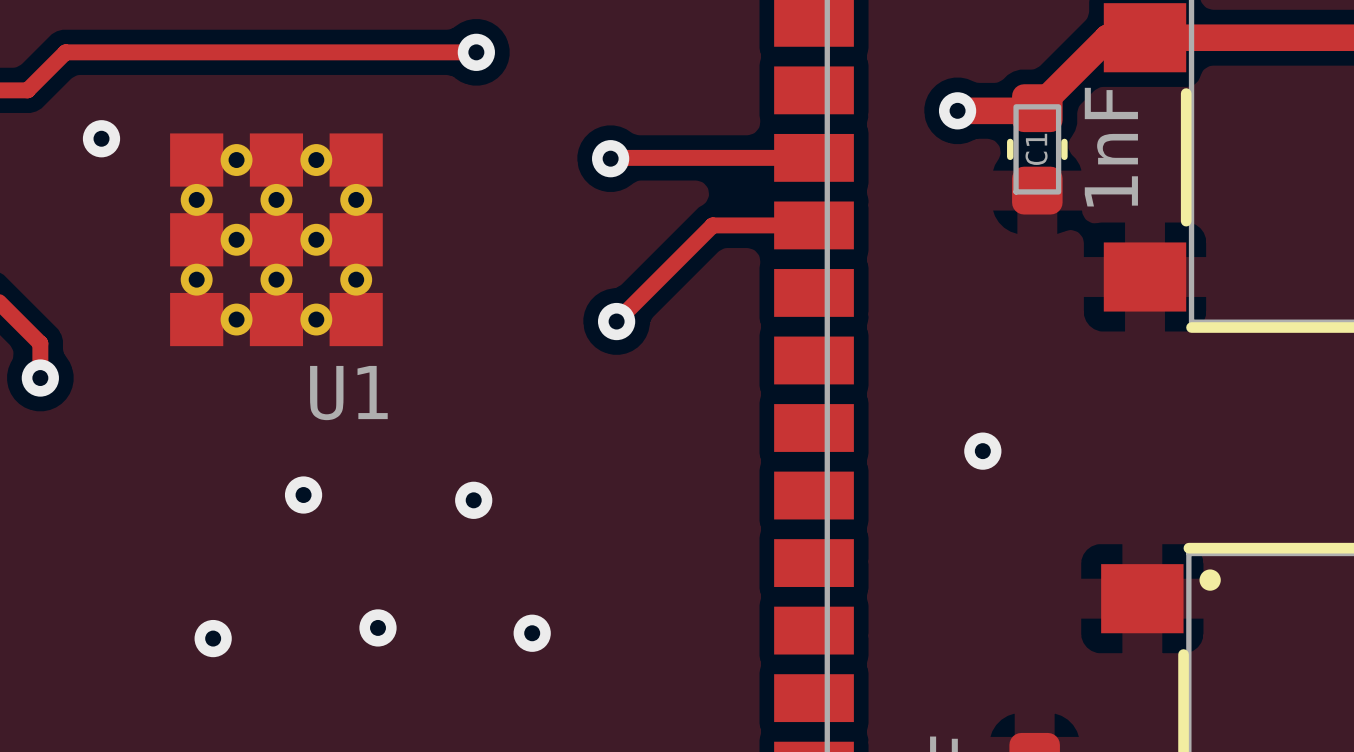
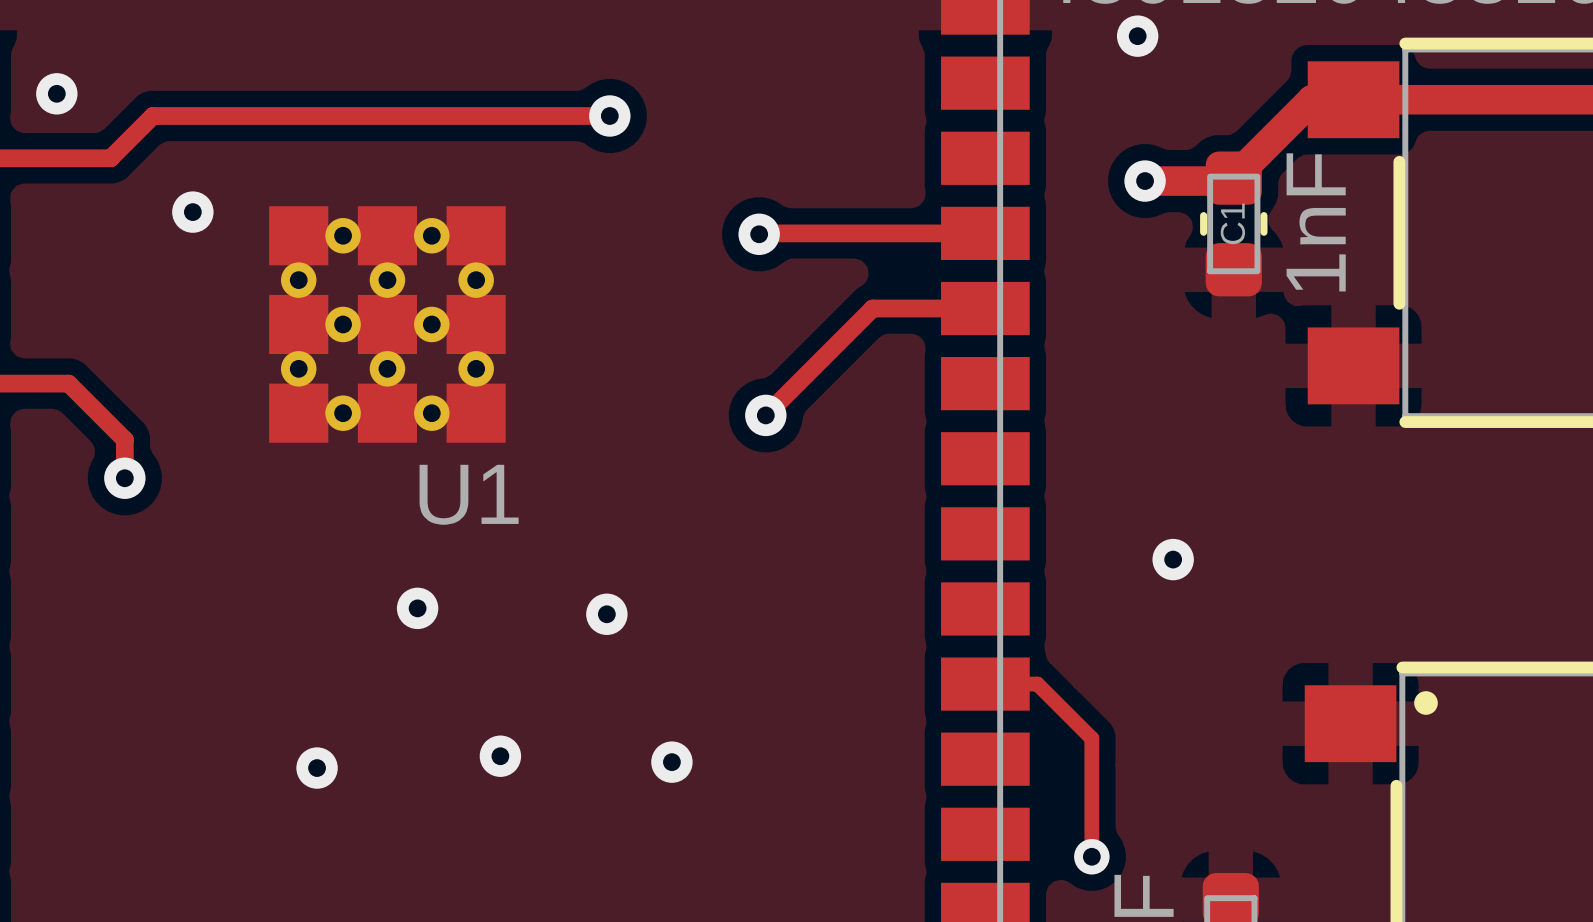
track: none -> (985, 684) (1037, 684) (1091, 738) (1091, 856)
via: none -> (1091, 856)

